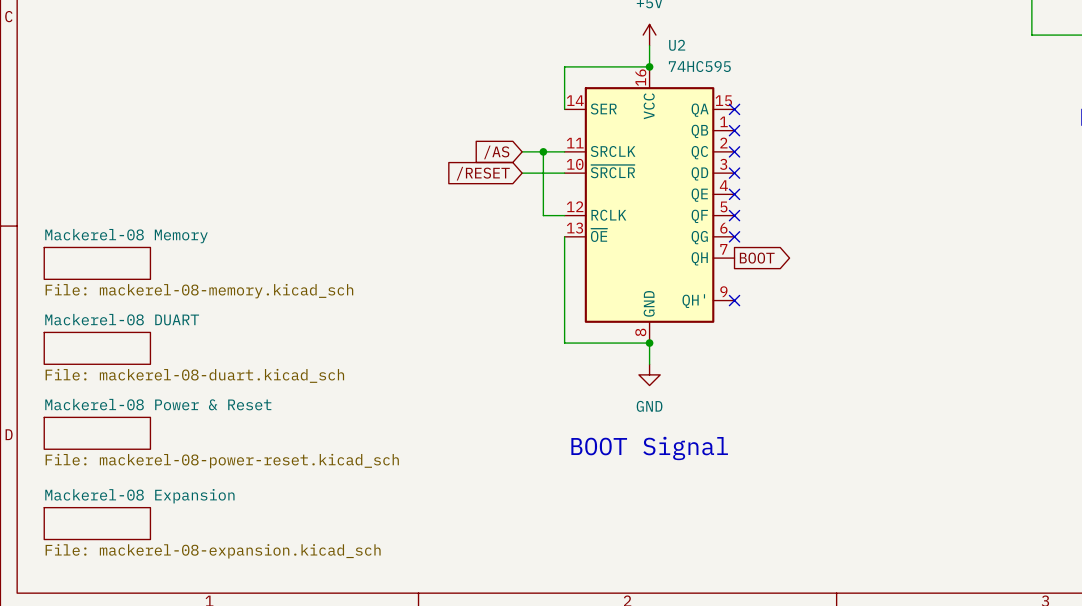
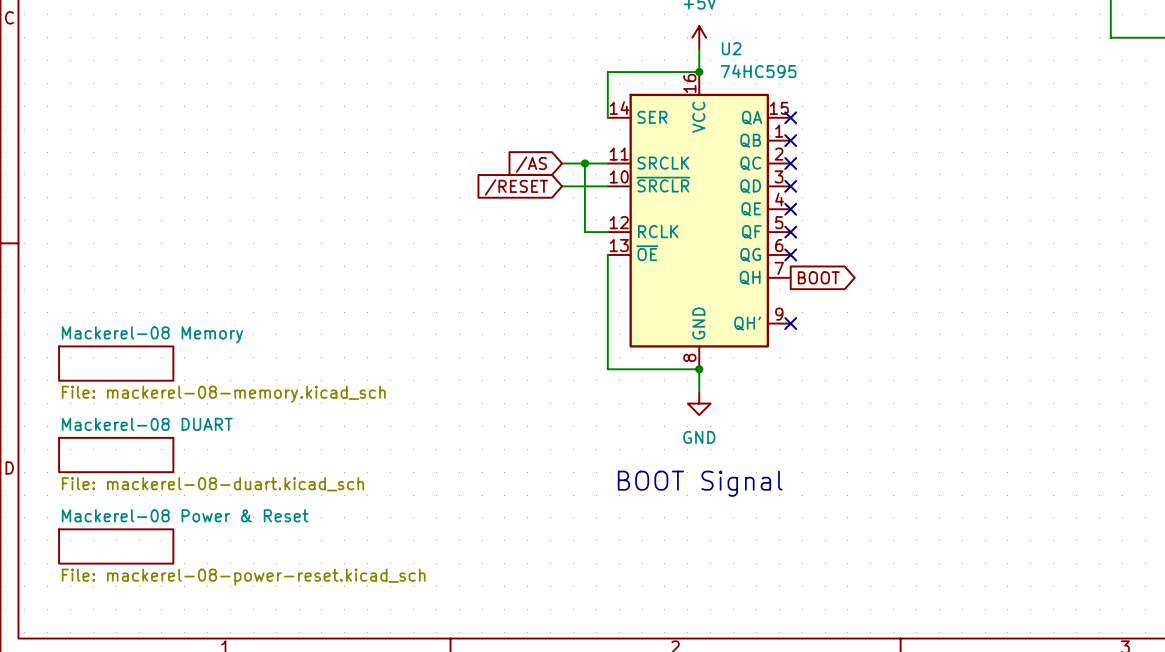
sheet Mackerel-08 Memory position: (97, 263) -> (116, 363)
sheet Mackerel-08 DUART position: (97, 348) -> (116, 455)
sheet Mackerel-08 Power & Reset position: (97, 433) -> (116, 546)
sheet Mackerel-08 Expansion: File: mackerel-08-expansion.kicad_sch (97, 523) -> none

